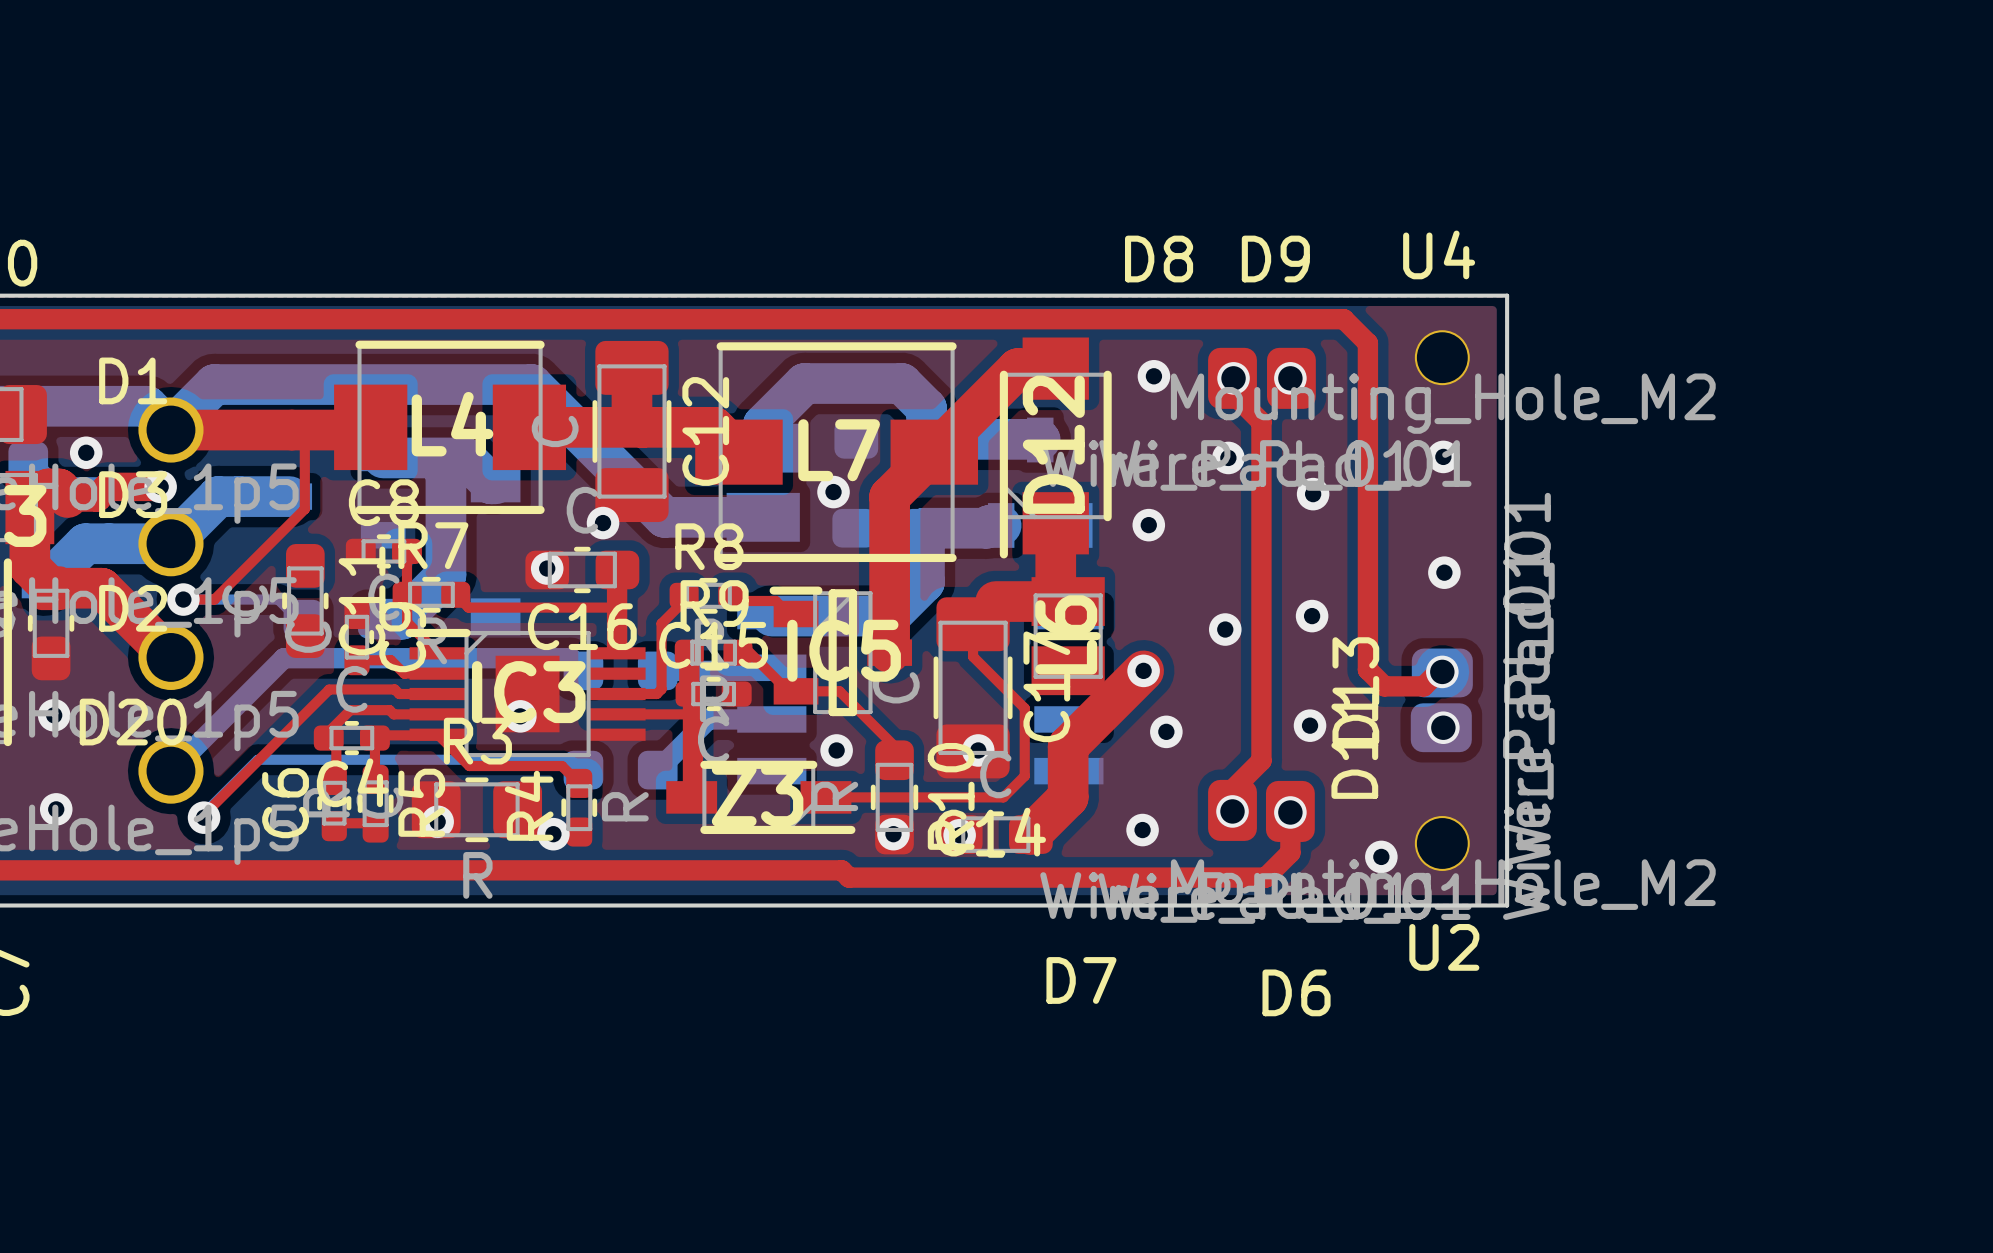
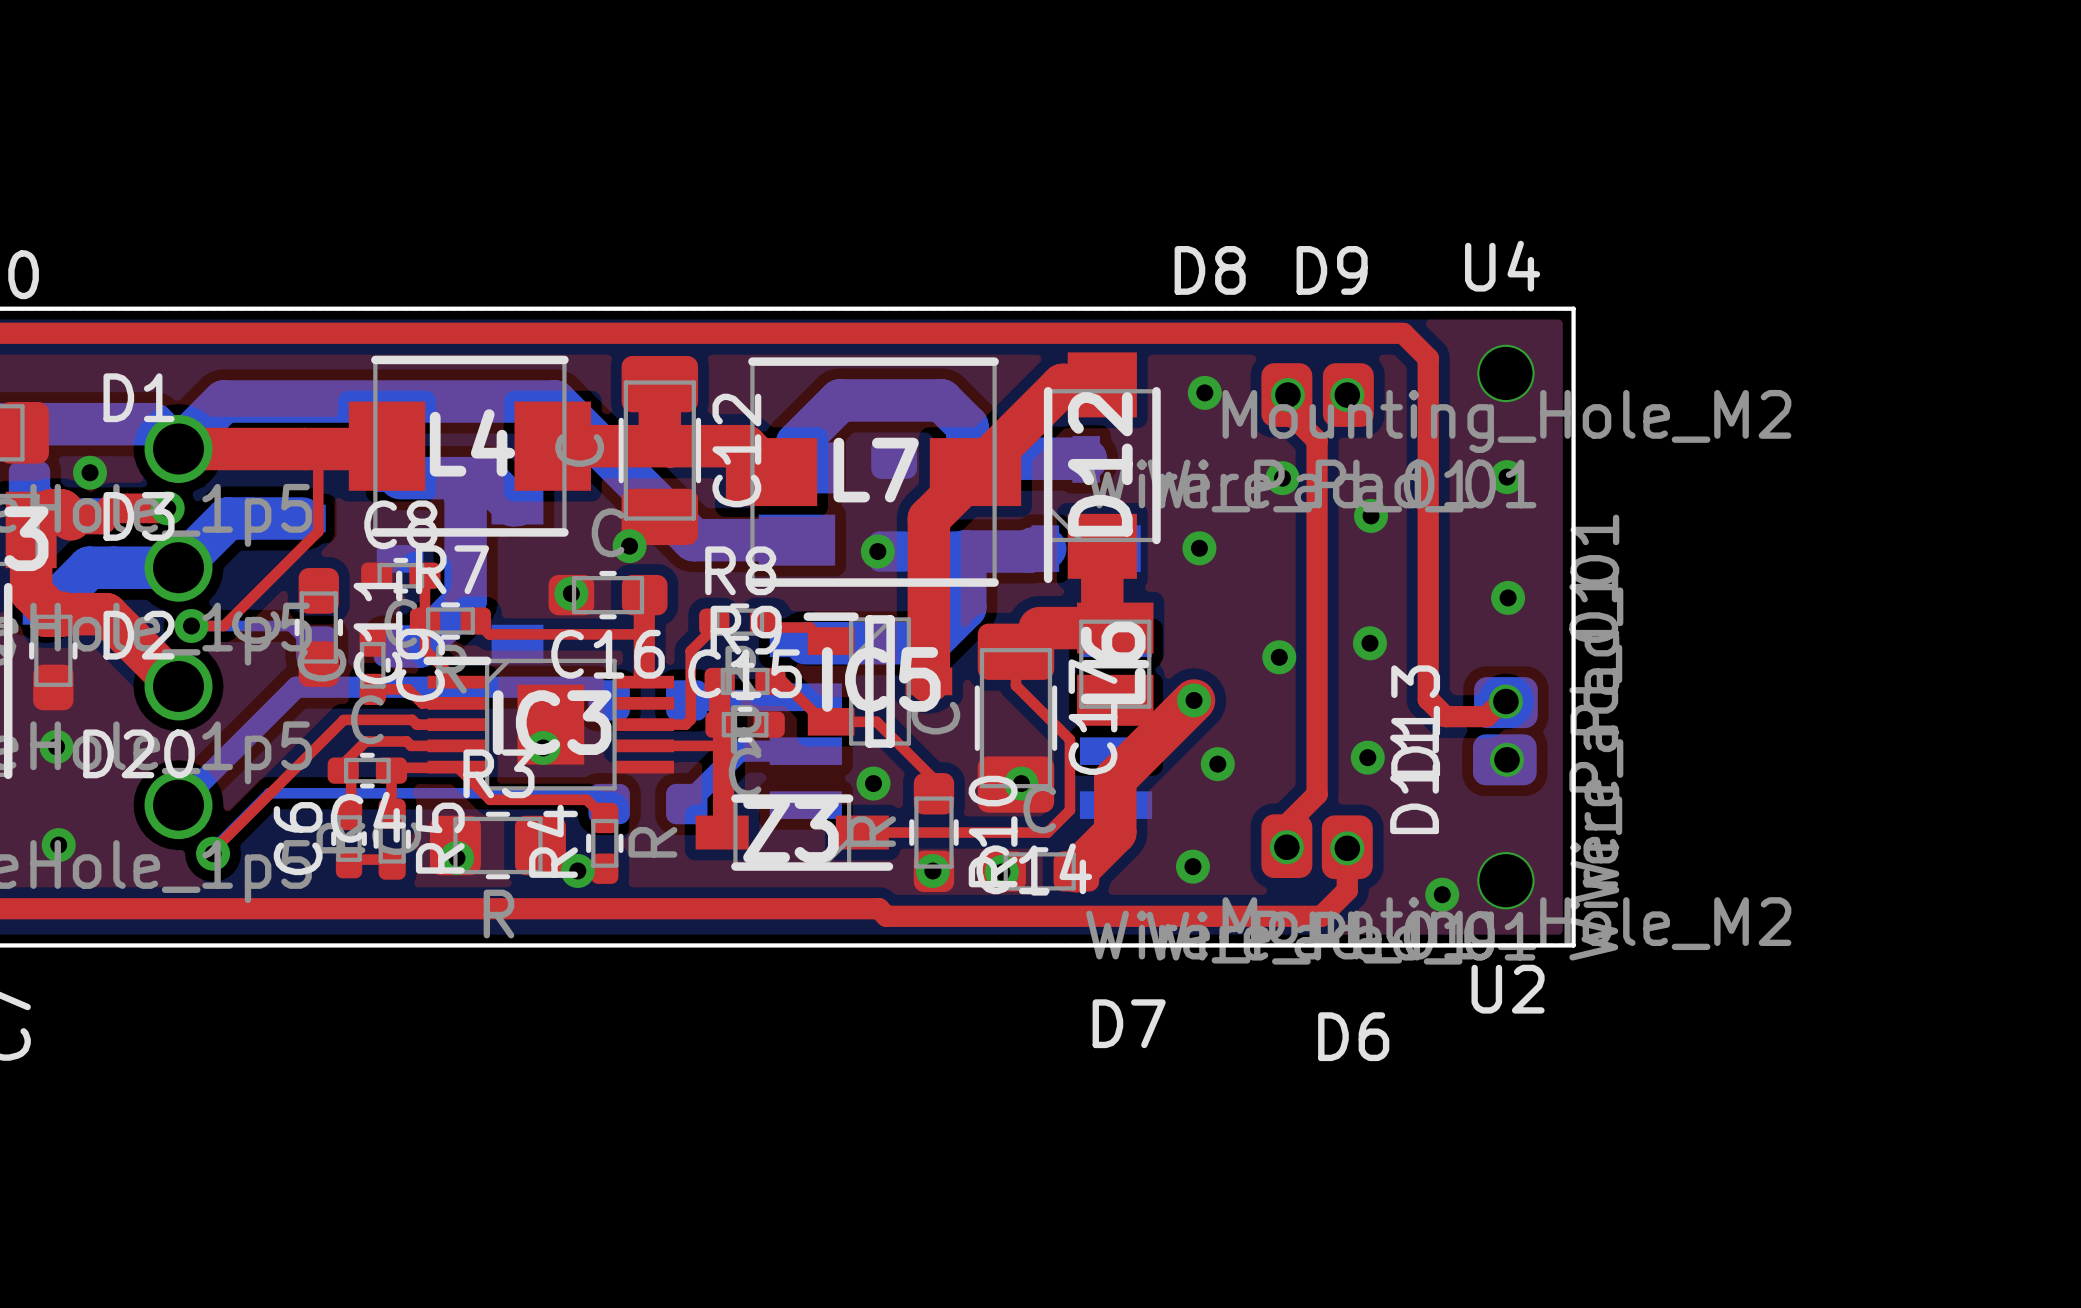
via position: (833, 492) -> (877, 551)

